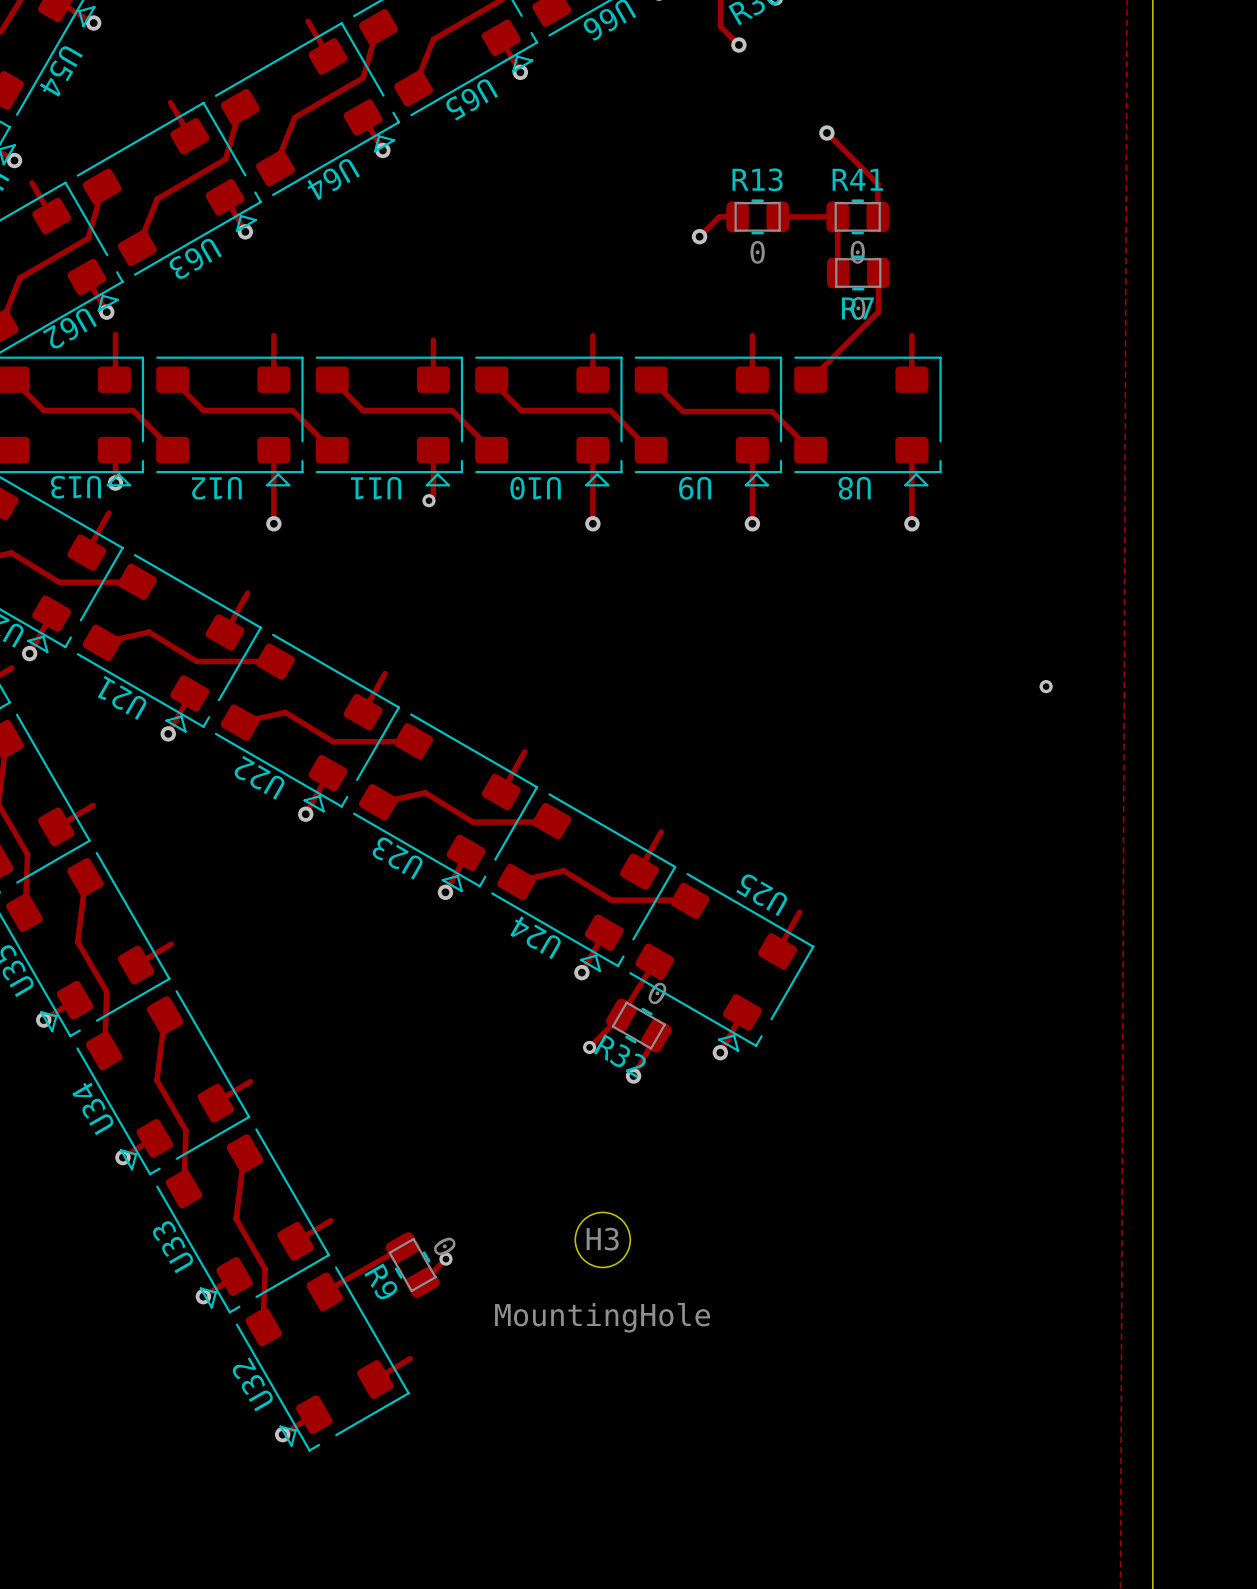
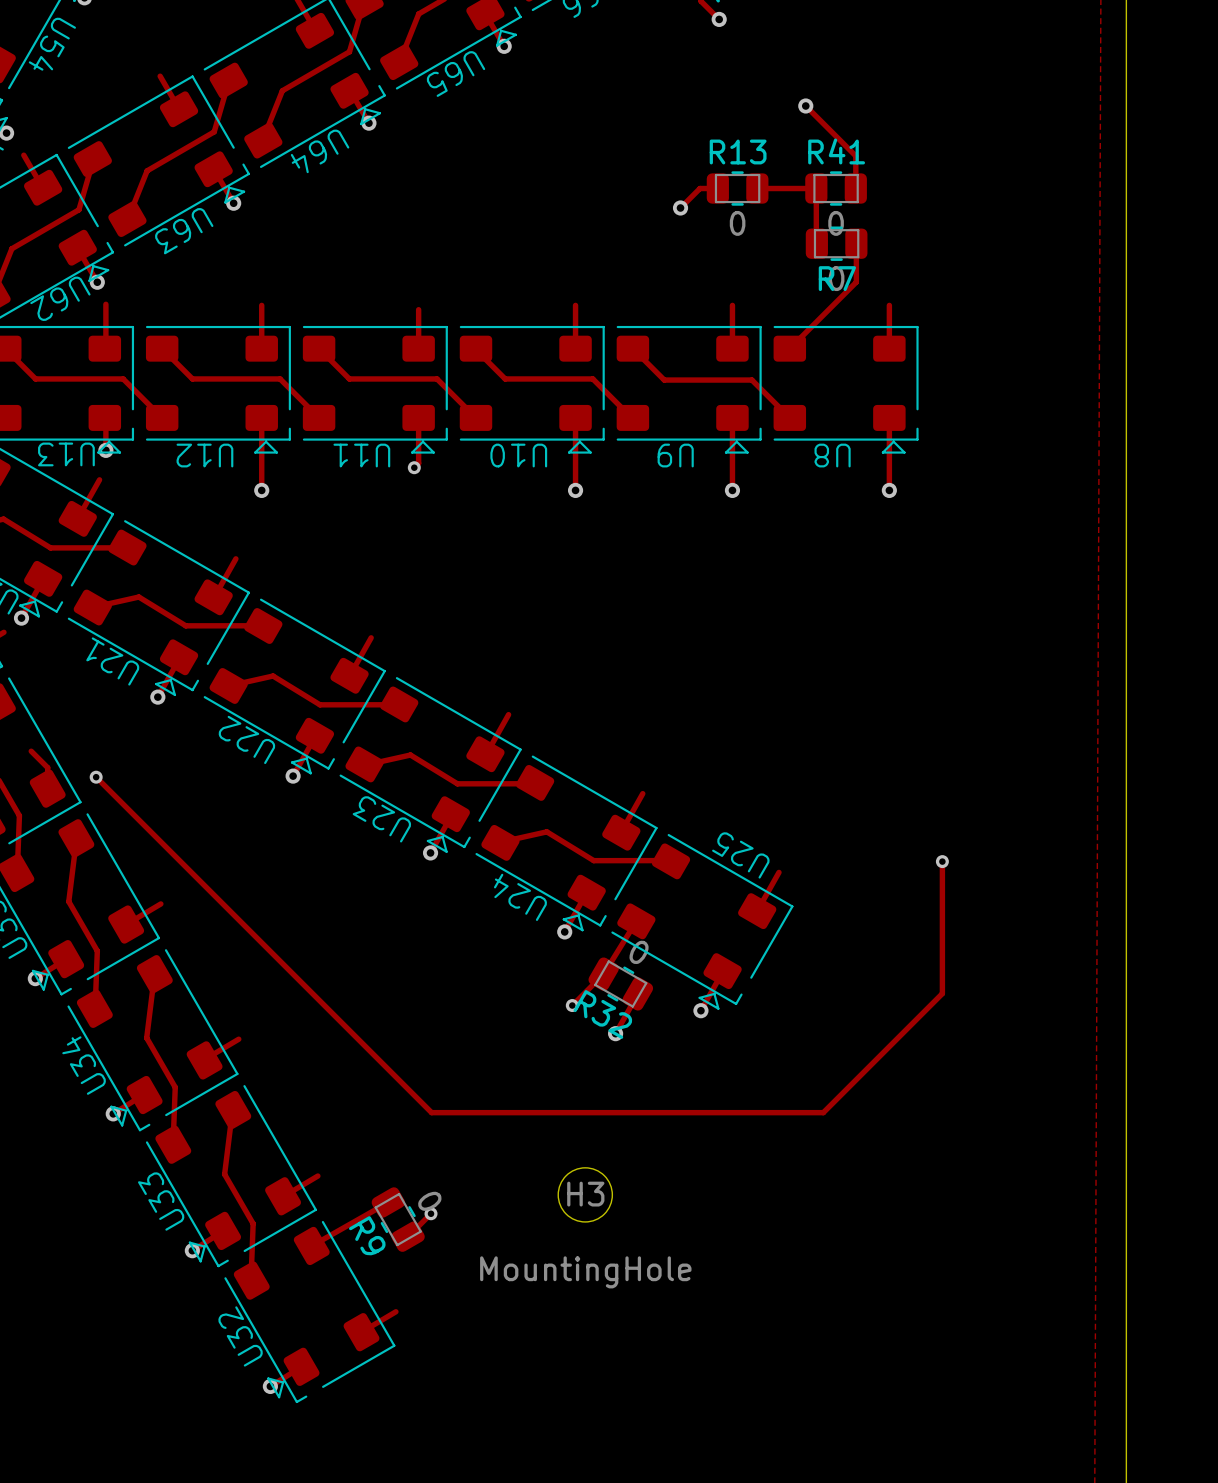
via: (1046, 686) -> none
track: none -> (31, 751) (47, 767) (47, 788)
track: (93, 805) (58, 826) -> none
track: none -> (96, 777) (431, 1112) (823, 1112) (942, 993) (942, 861)
via: none -> (96, 777)
via: none -> (942, 861)

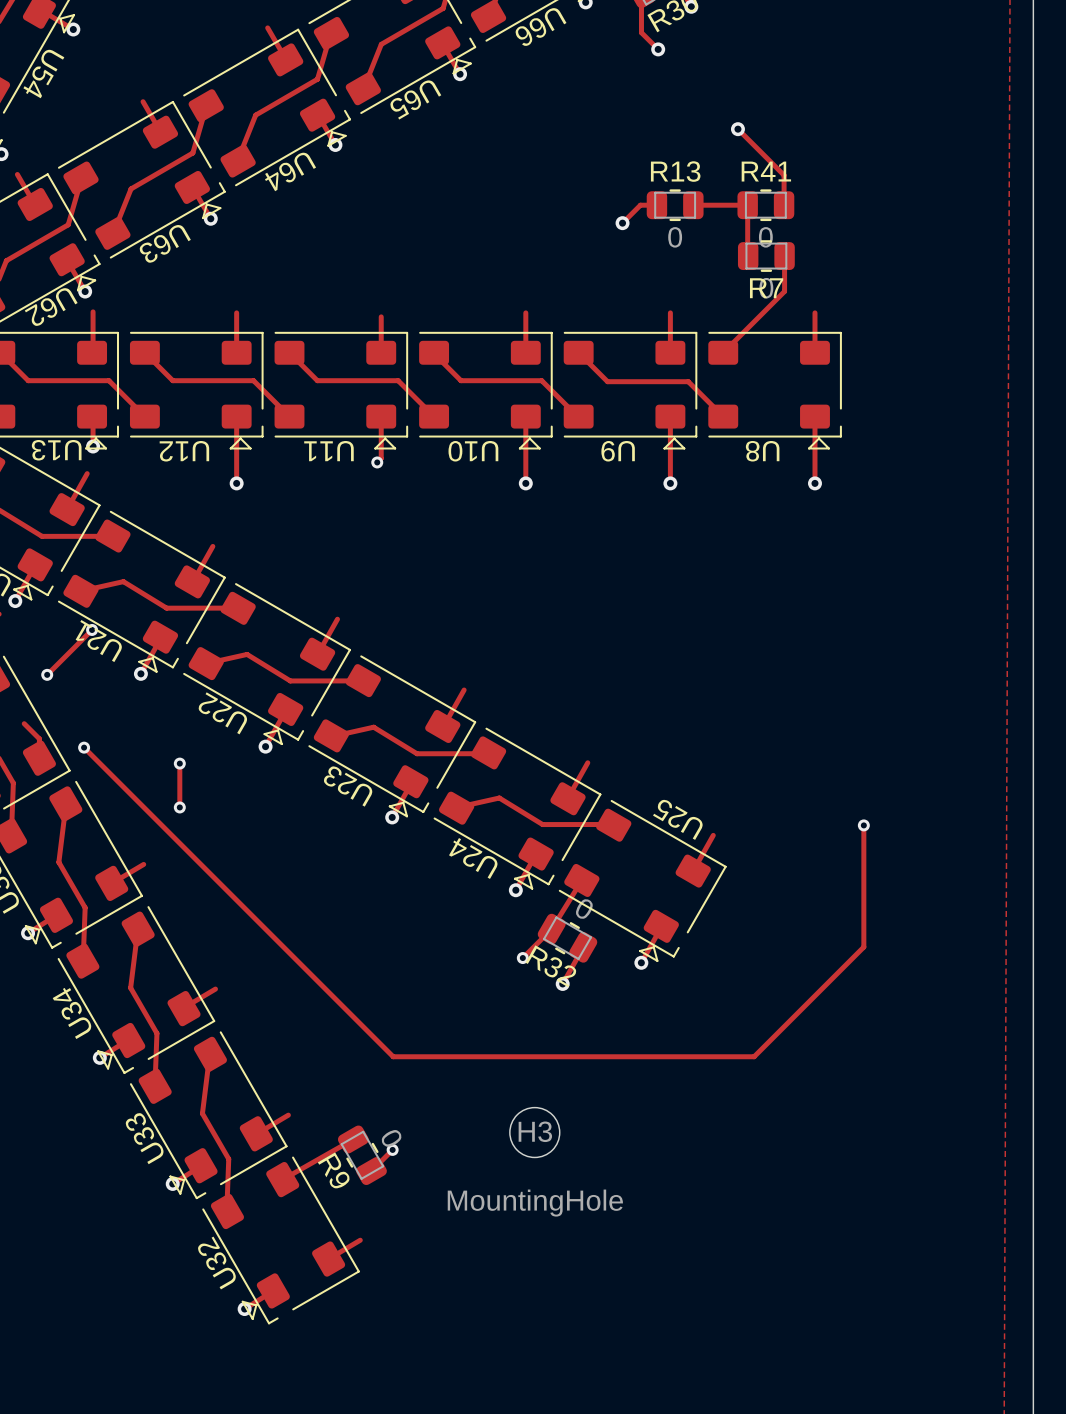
track: none -> (92, 629) (47, 674)
via: none -> (92, 629)
via: none -> (47, 674)
track: none -> (179, 763) (179, 807)
via: none -> (179, 763)
via: none -> (179, 807)

